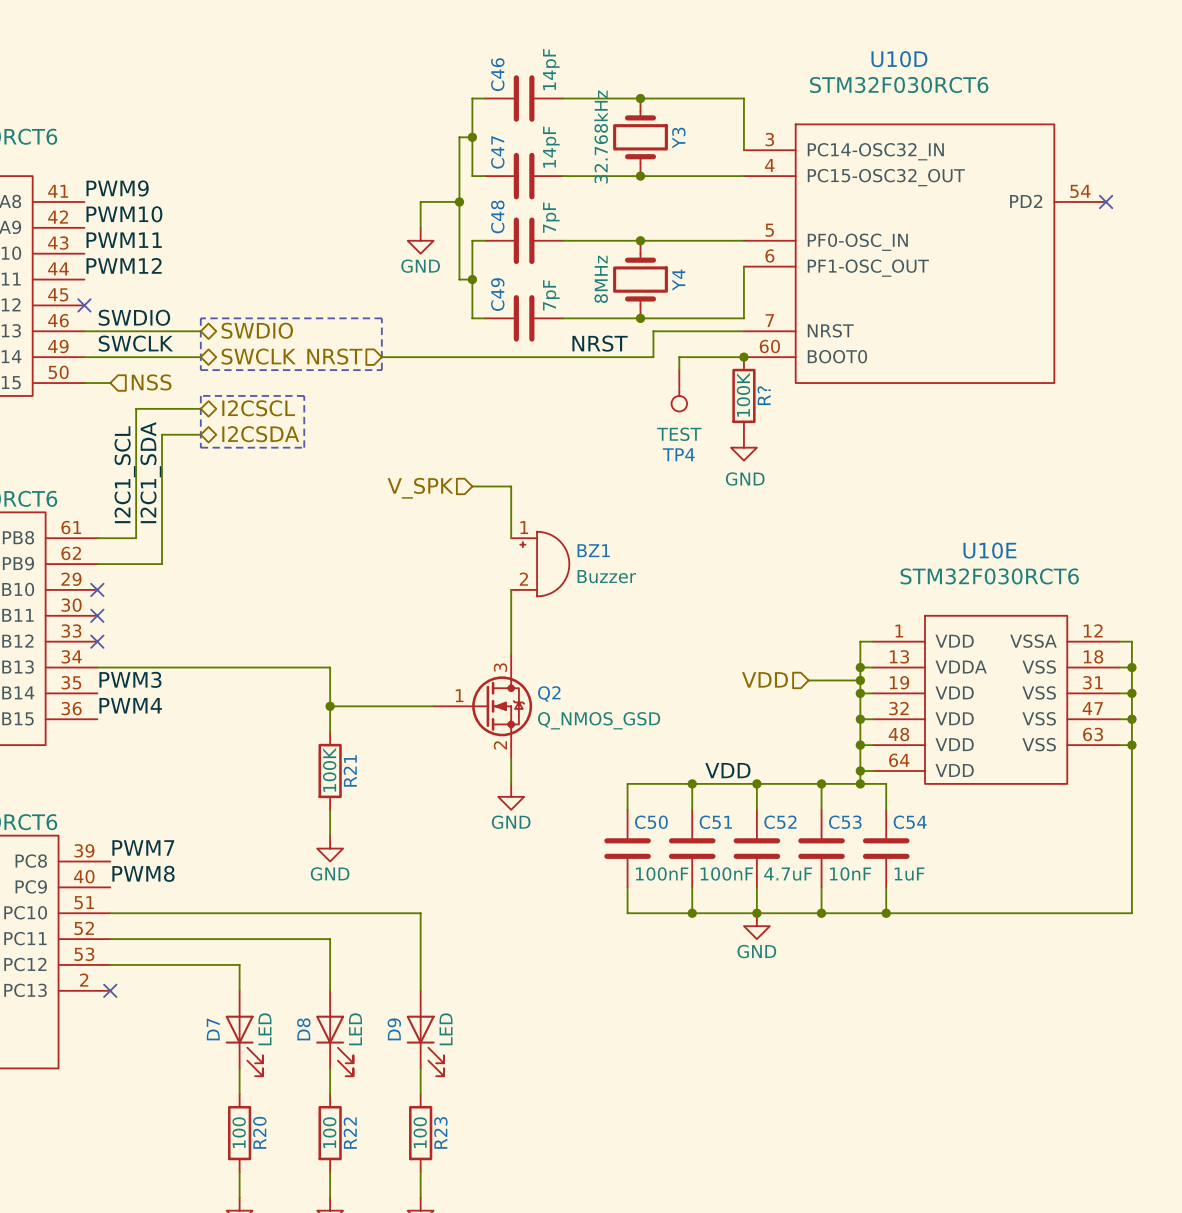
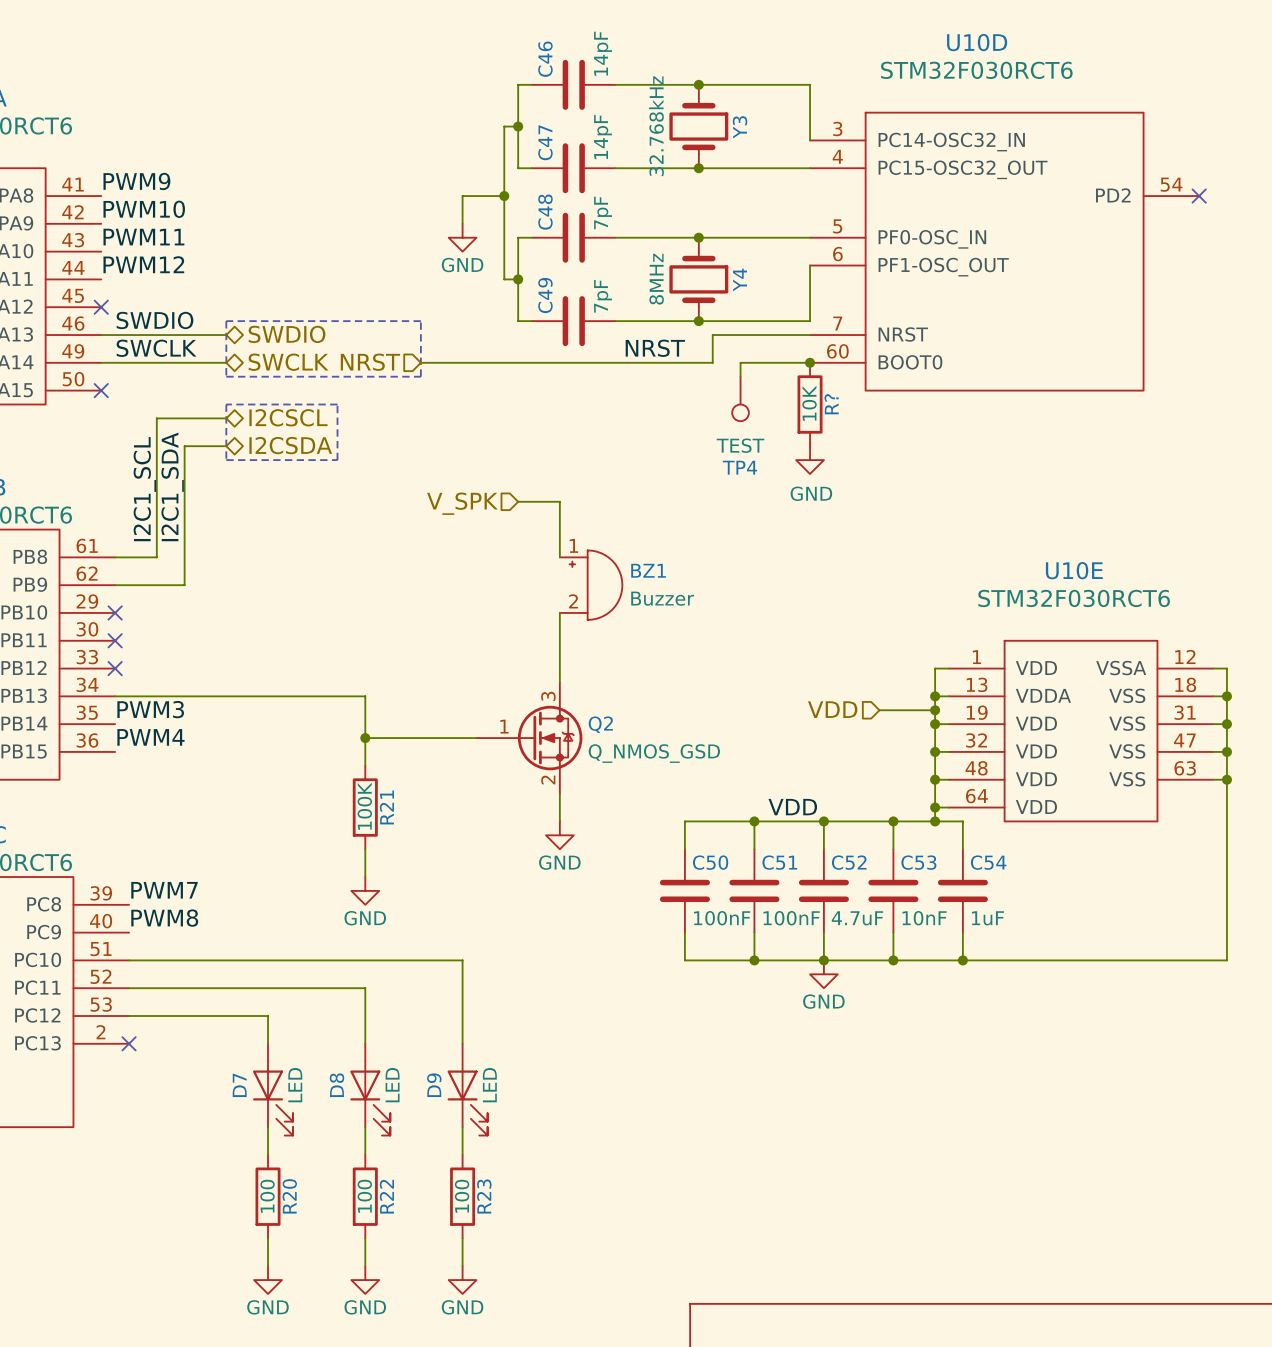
hierarchical label: NSS (151, 382) -> none
wire: (84, 383) (110, 383) -> none
no-connect mark: none -> (101, 390)
R? value: 100K (743, 394) -> 10K (809, 403)

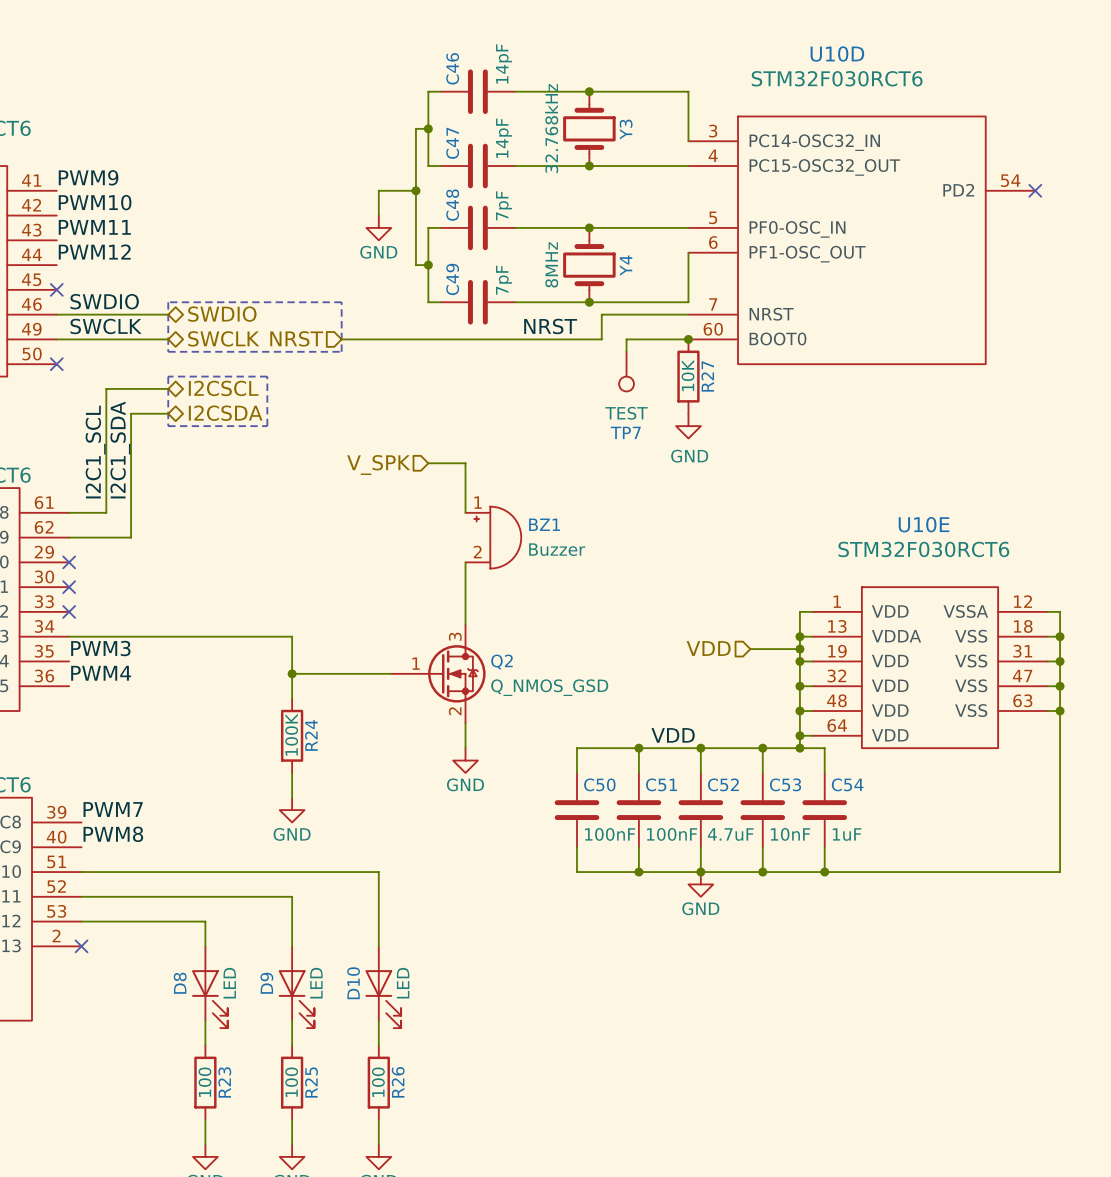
R? name: R? (831, 404) -> R27 (707, 376)
TP4 name: TP4 (739, 467) -> TP7 (625, 432)
R21 name: R21 (386, 807) -> R24 (311, 735)
D7 name: D7 (239, 1085) -> D8 (180, 983)
D8 name: D8 (336, 1085) -> D9 (266, 983)
D9 name: D9 (434, 1085) -> D10 (353, 983)
R20 name: R20 (289, 1196) -> R23 (224, 1082)
R22 name: R22 (386, 1196) -> R25 (311, 1082)
R23 name: R23 (484, 1196) -> R26 (398, 1082)

